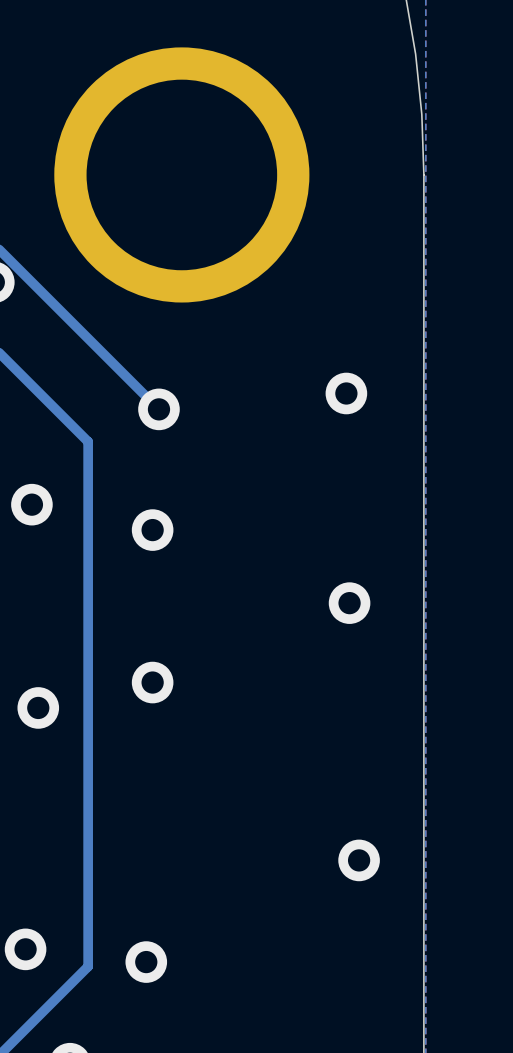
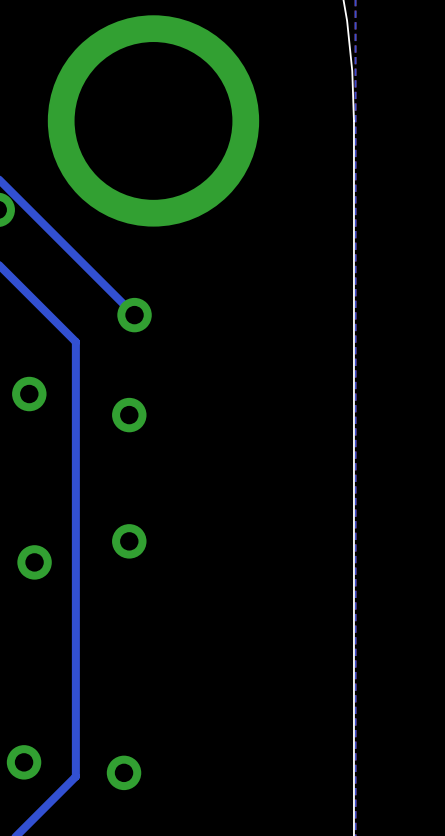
via: (346, 393) -> none
via: (349, 603) -> none
via: (359, 860) -> none

